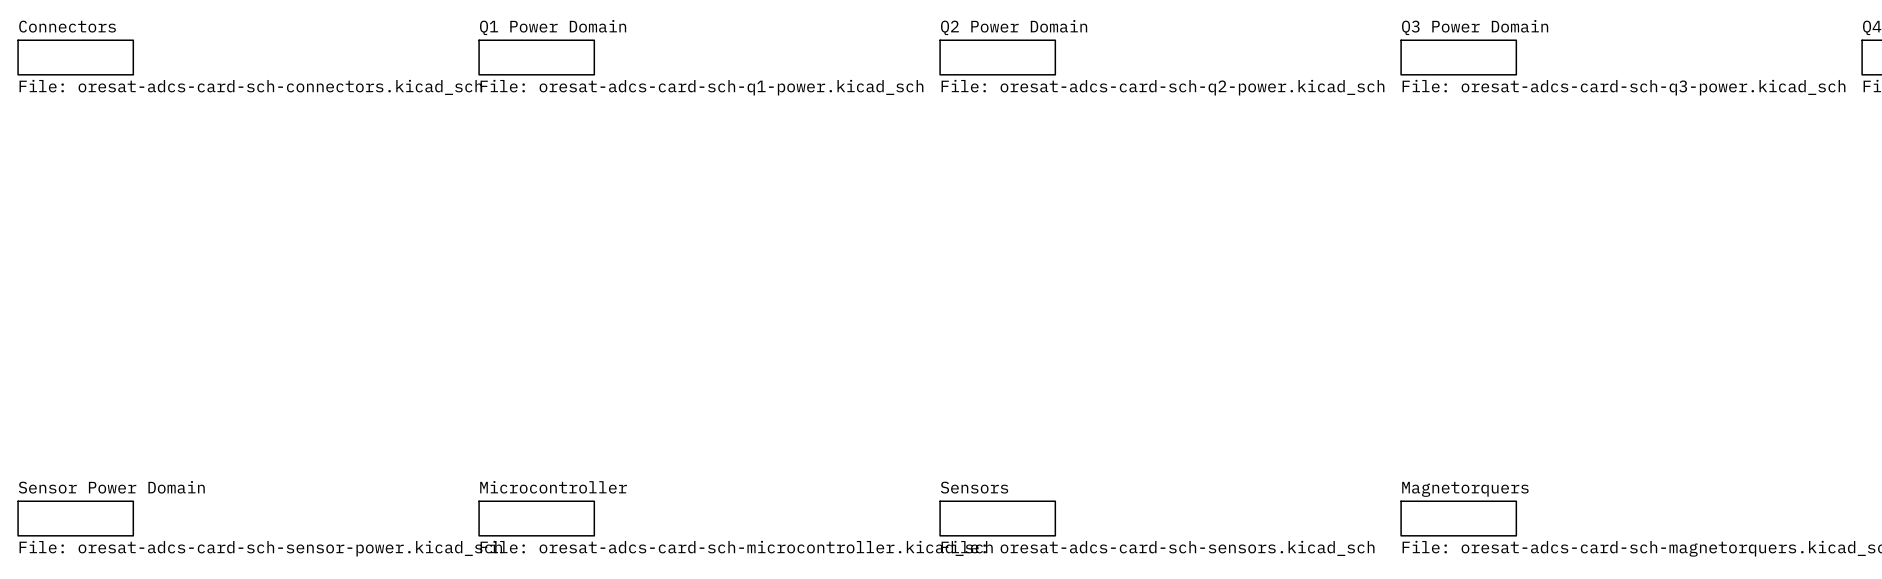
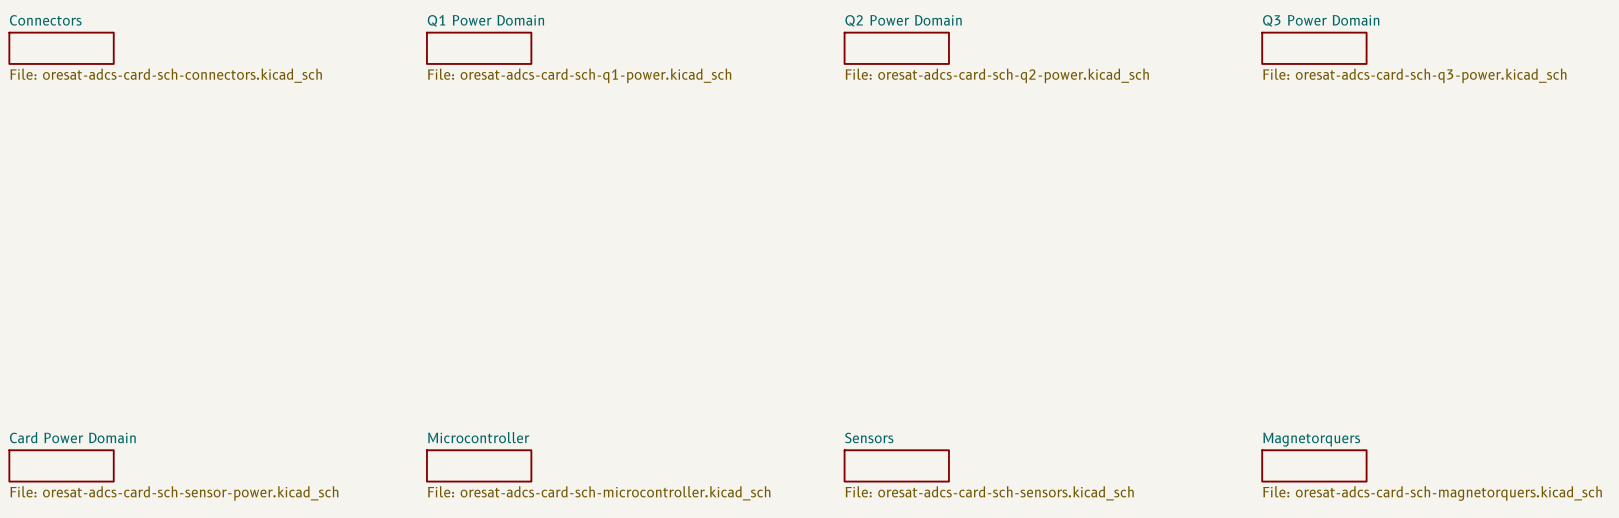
sheet Sensor Power Domain name: Sensor Power Domain (111, 487) -> Card Power Domain (72, 437)

